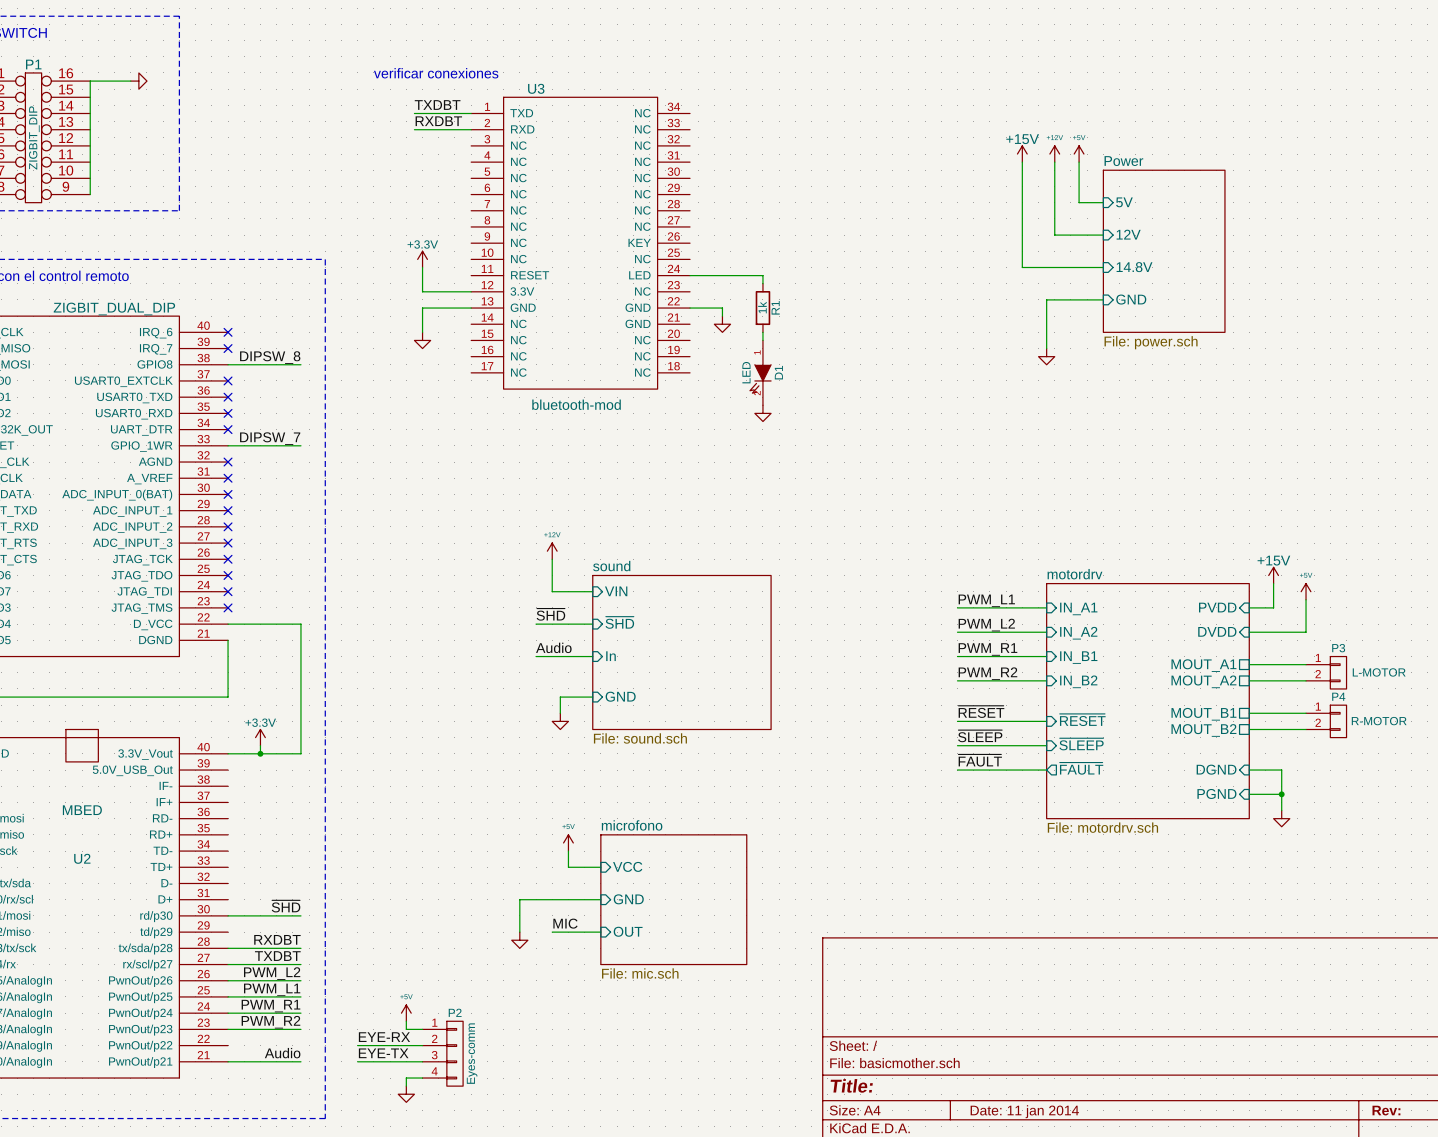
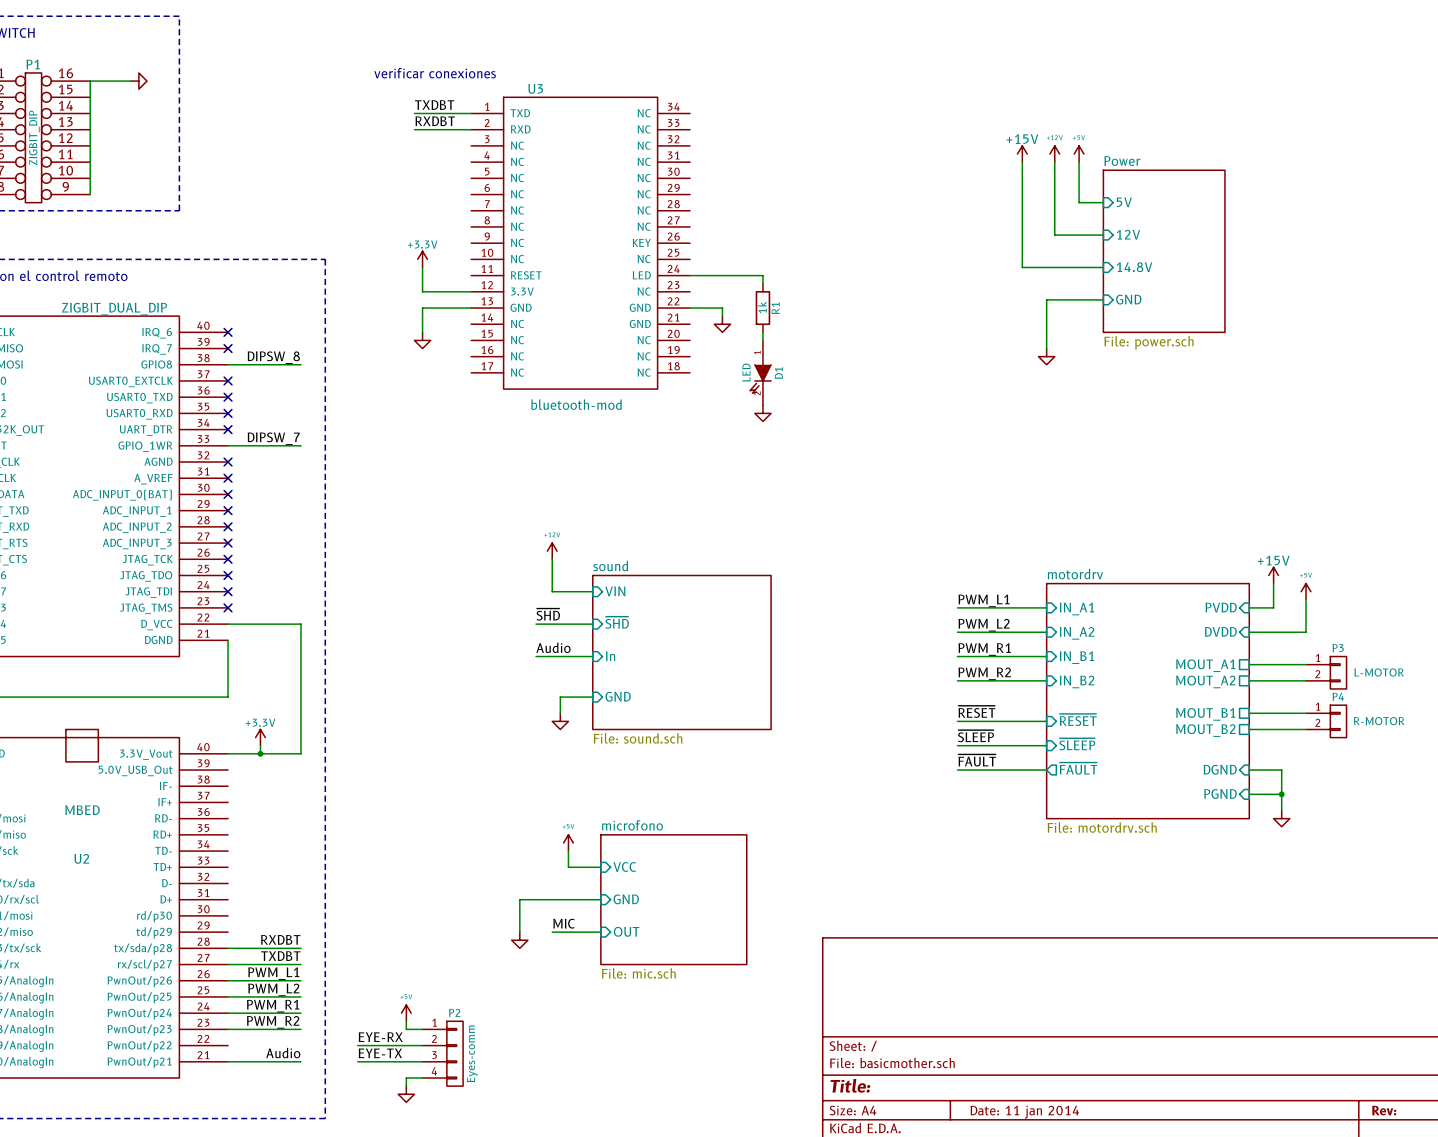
label: ~{SHD} (286, 906) -> none
wire: (228, 915) (300, 915) -> none
label: PWM_L2 (272, 973) -> PWM_L1 (273, 973)
label: PWM_L1 (272, 989) -> PWM_L2 (273, 989)

